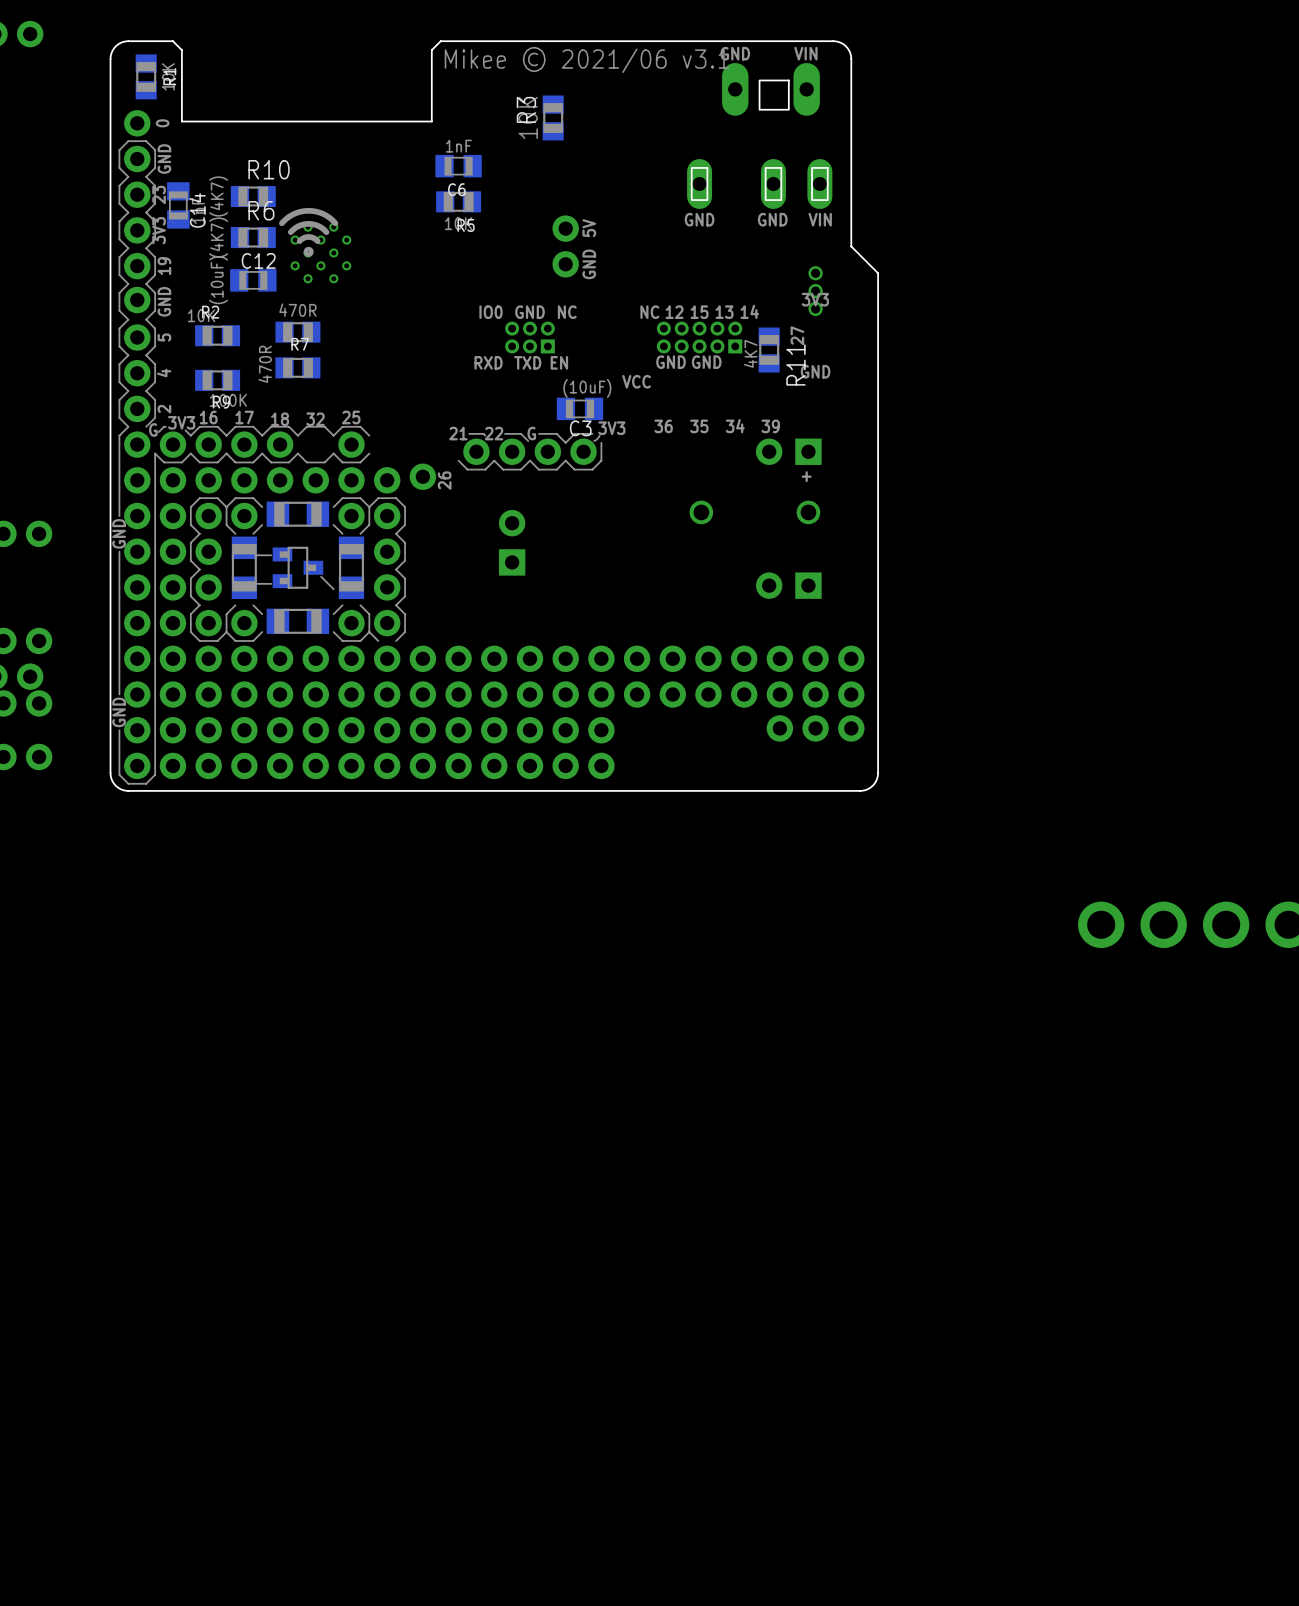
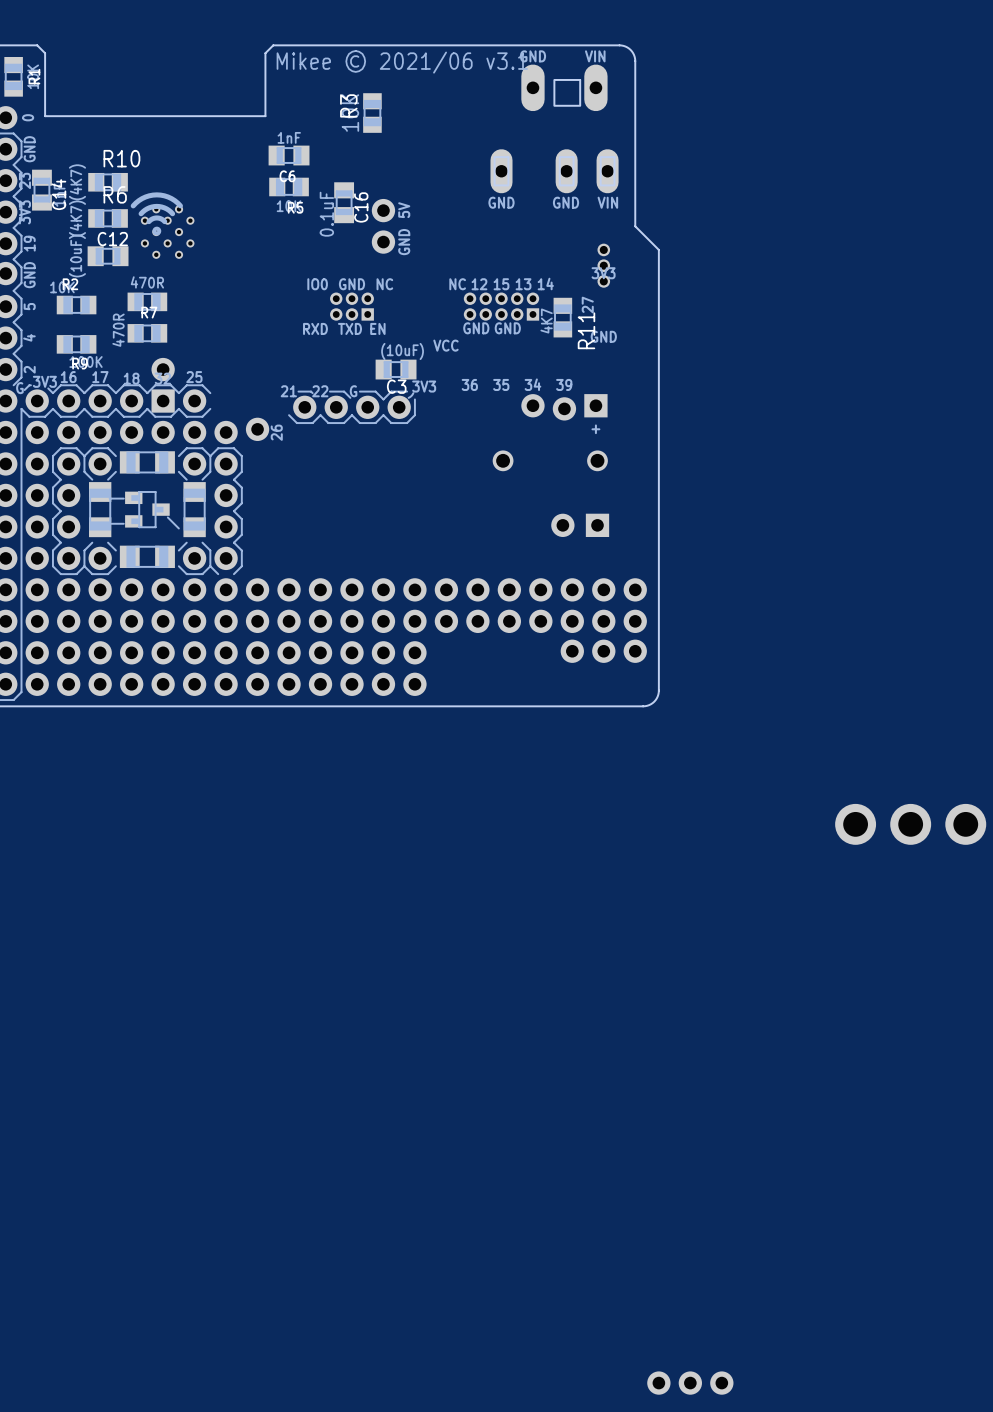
C16: none -> 0.1uF (344, 202)
part: none -> (163, 385)
part: none -> (564, 407)
part: (788, 451) -> none
part: (512, 542) -> none
part: none -> (690, 1383)

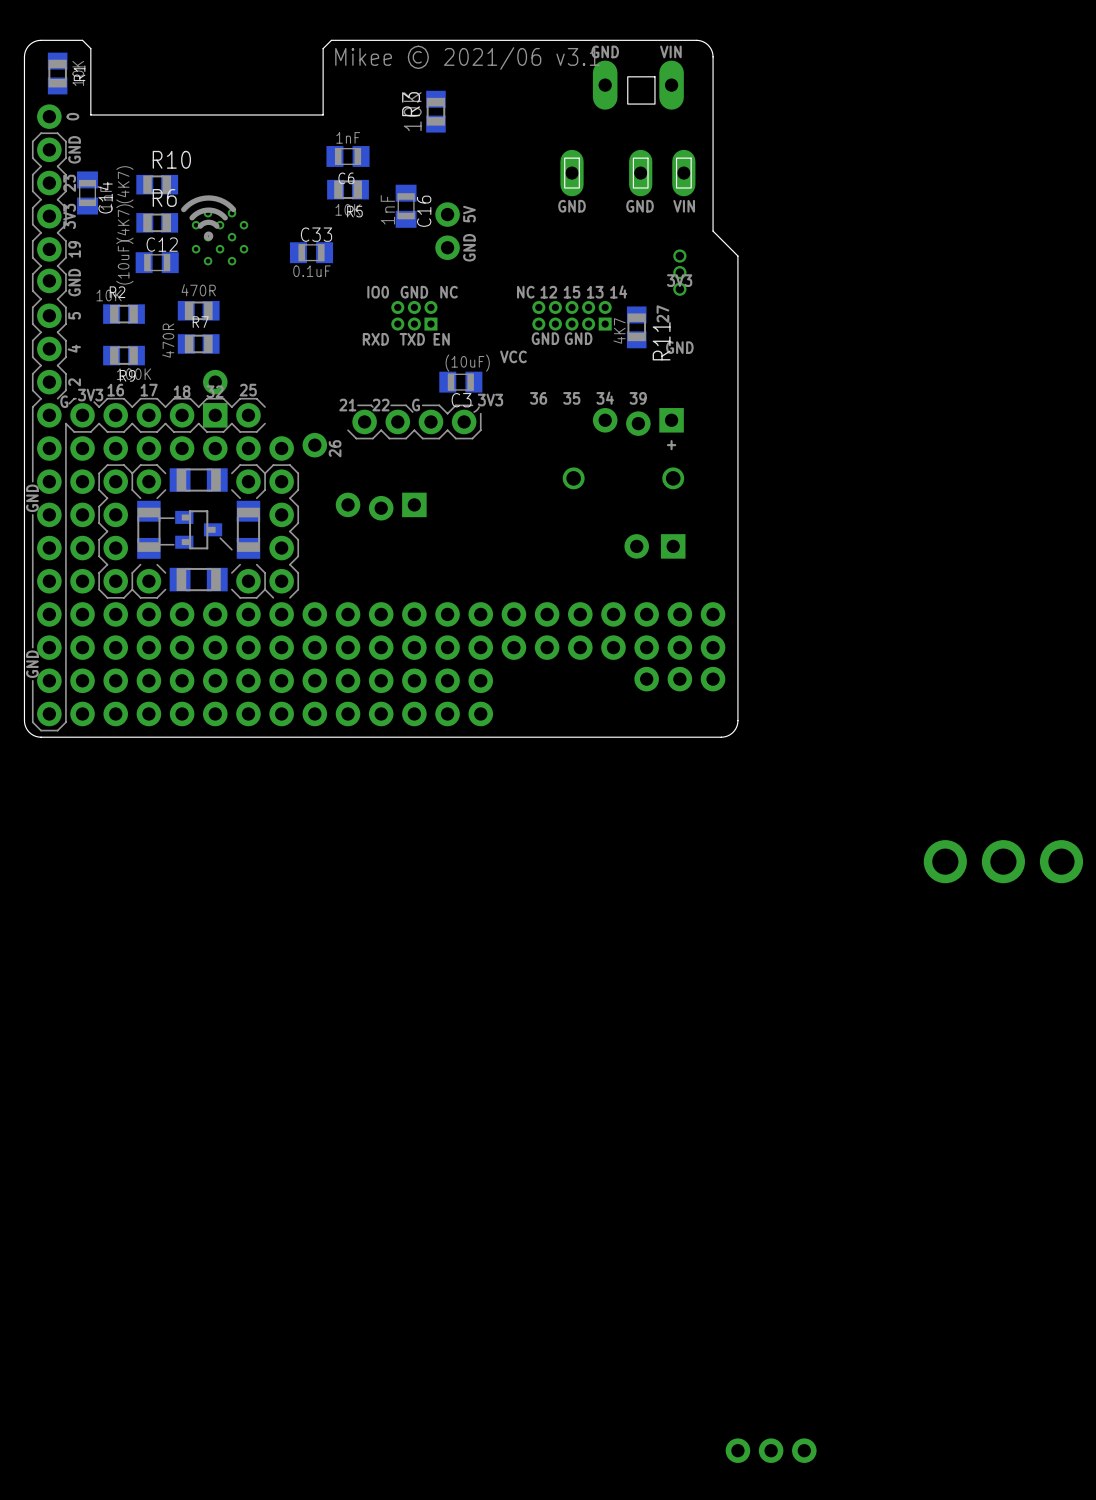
C16 value: 0.1uF (326, 214) -> 1nF (387, 209)
C33: none -> 0.1uF (311, 252)
part: none -> (381, 506)

